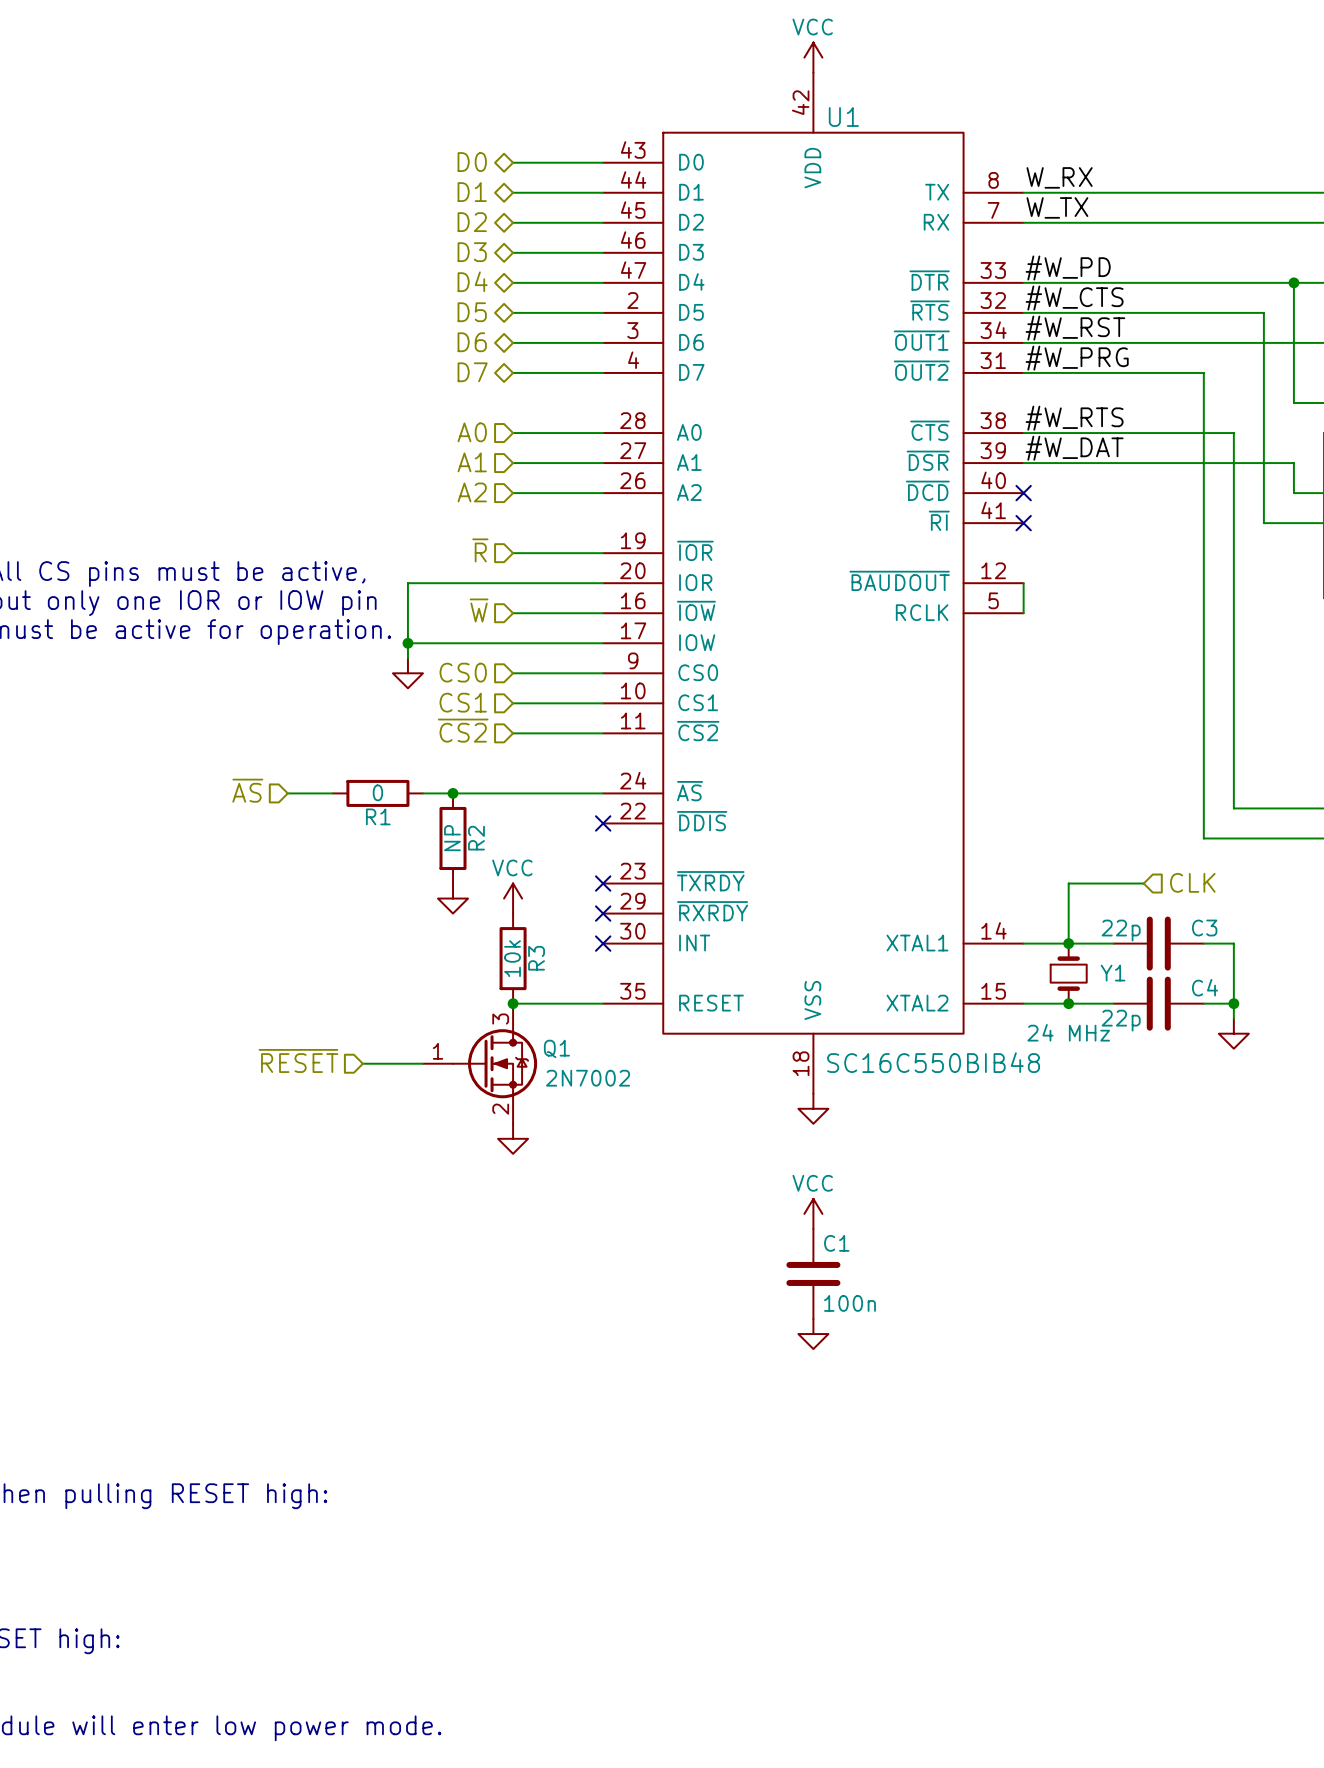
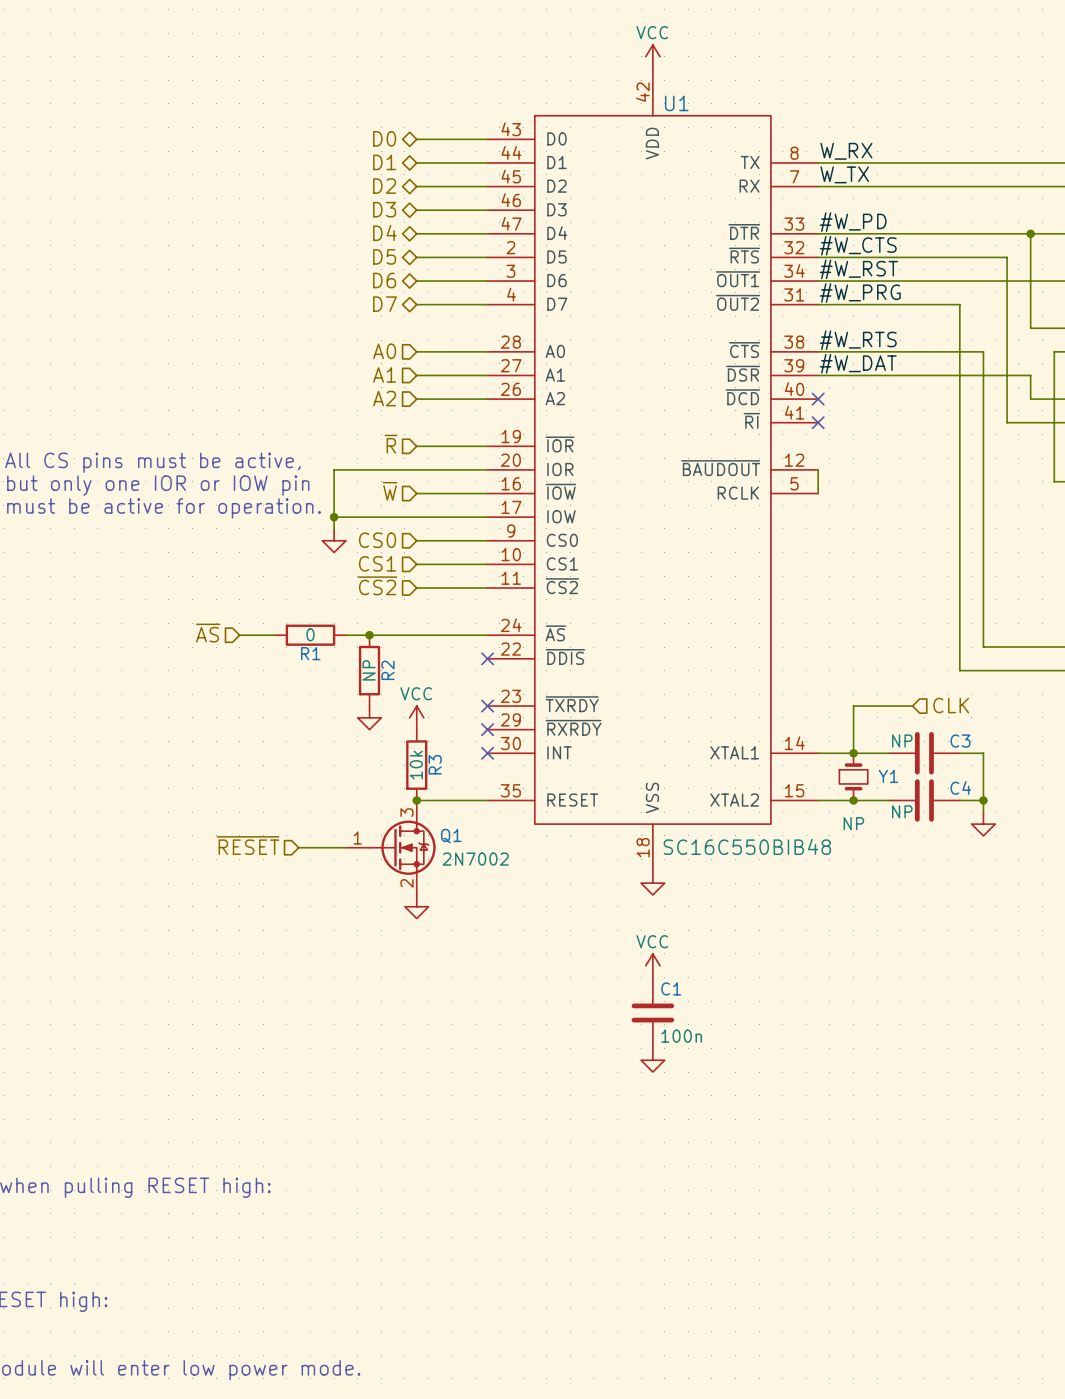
C3 value: 22p (1121, 930) -> NP (902, 741)
C4 value: 22p (1121, 1020) -> NP (902, 811)
Y1 value: 24 MHz (1068, 1032) -> NP (853, 823)

